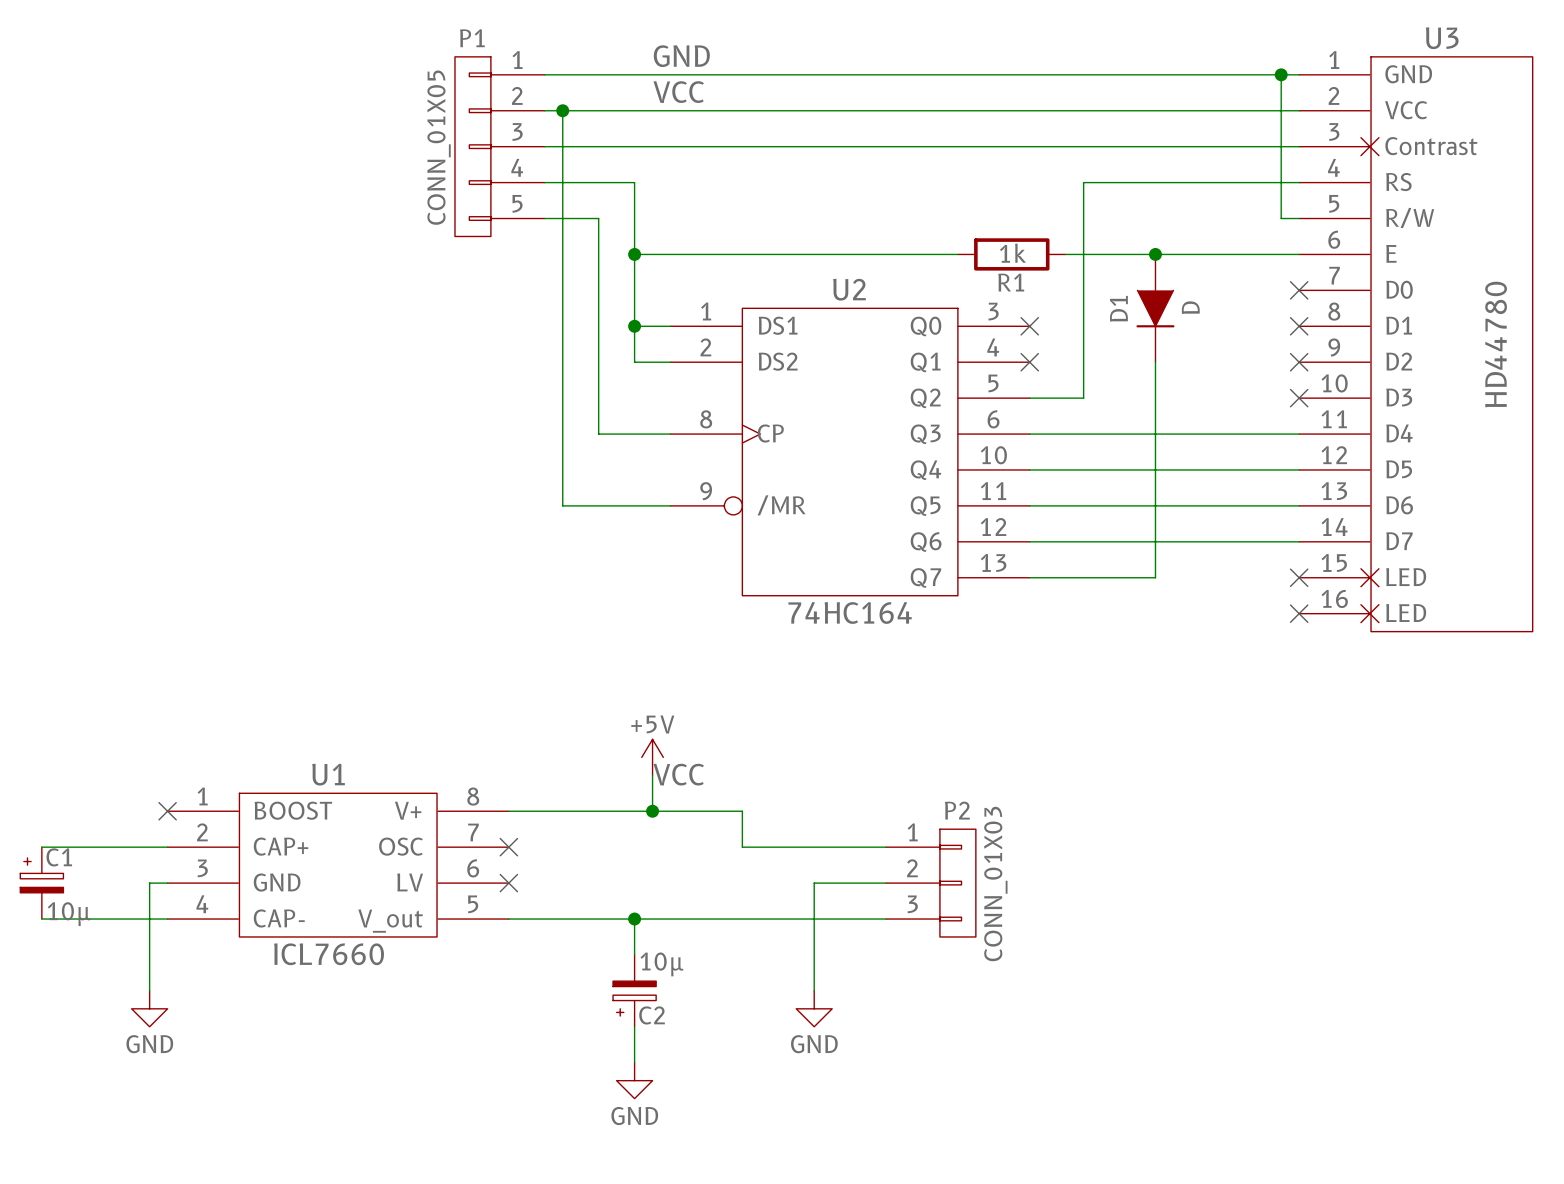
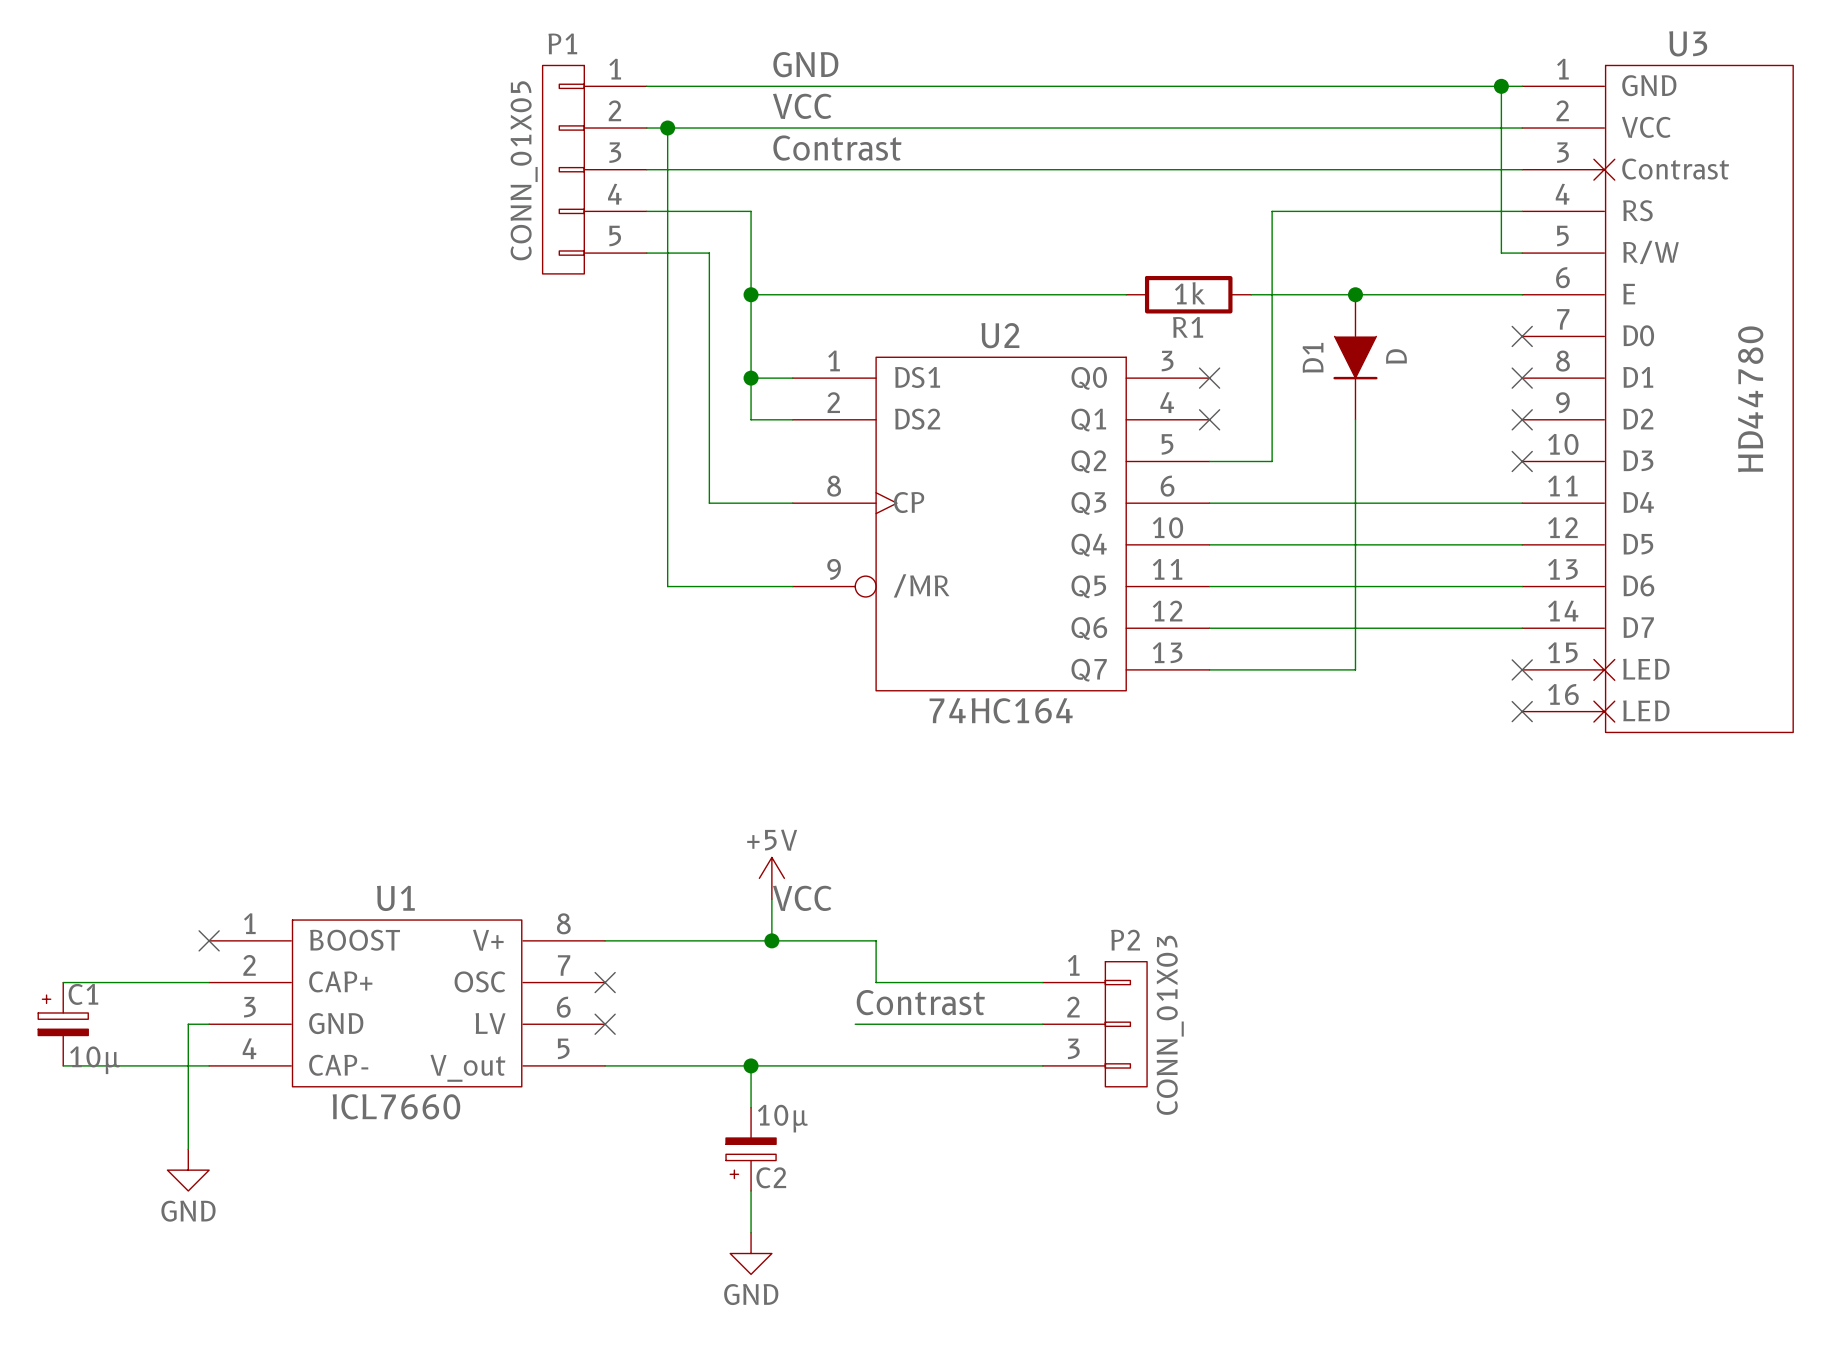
label: none -> Contrast (837, 148)
label: none -> Contrast (920, 1002)
wire: (814, 883) (814, 990) -> (959, 1024) (855, 1024)
power symbol: GND (814, 1008) -> none

